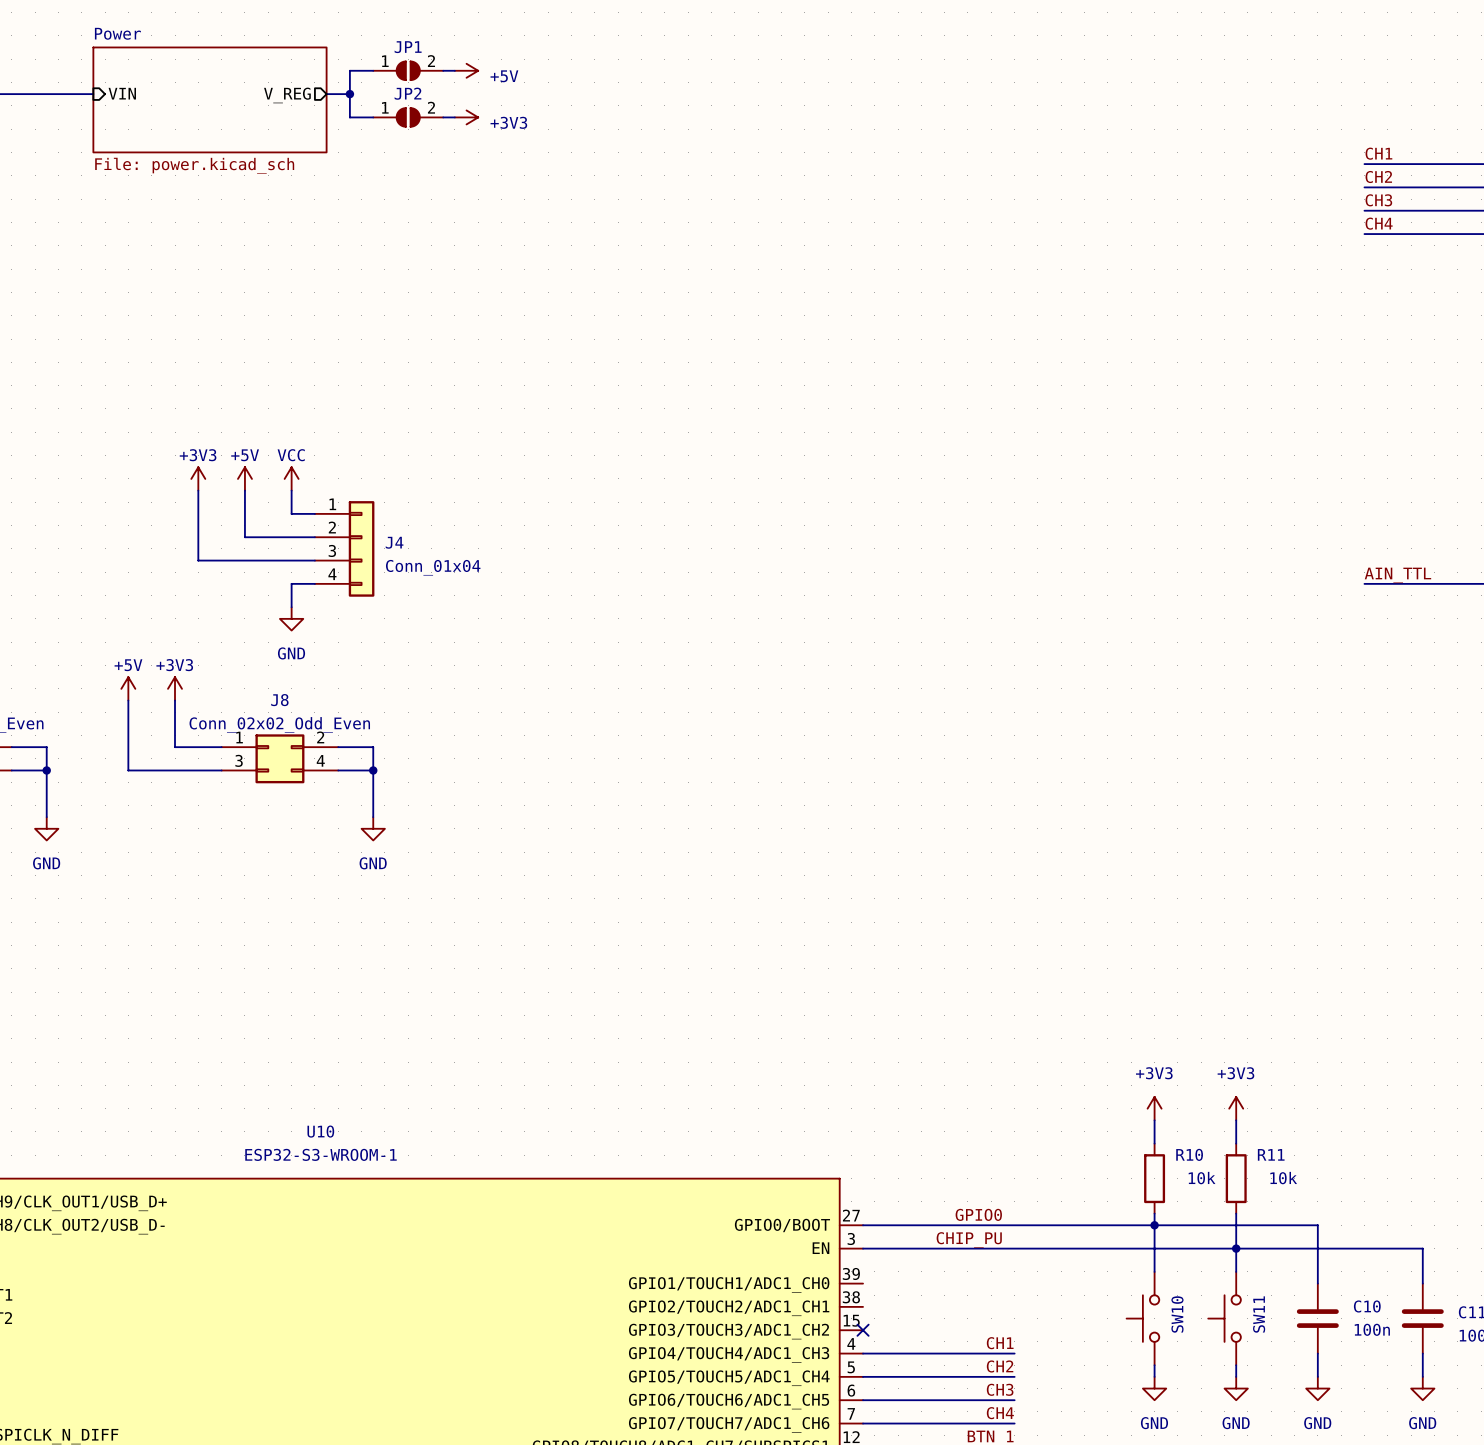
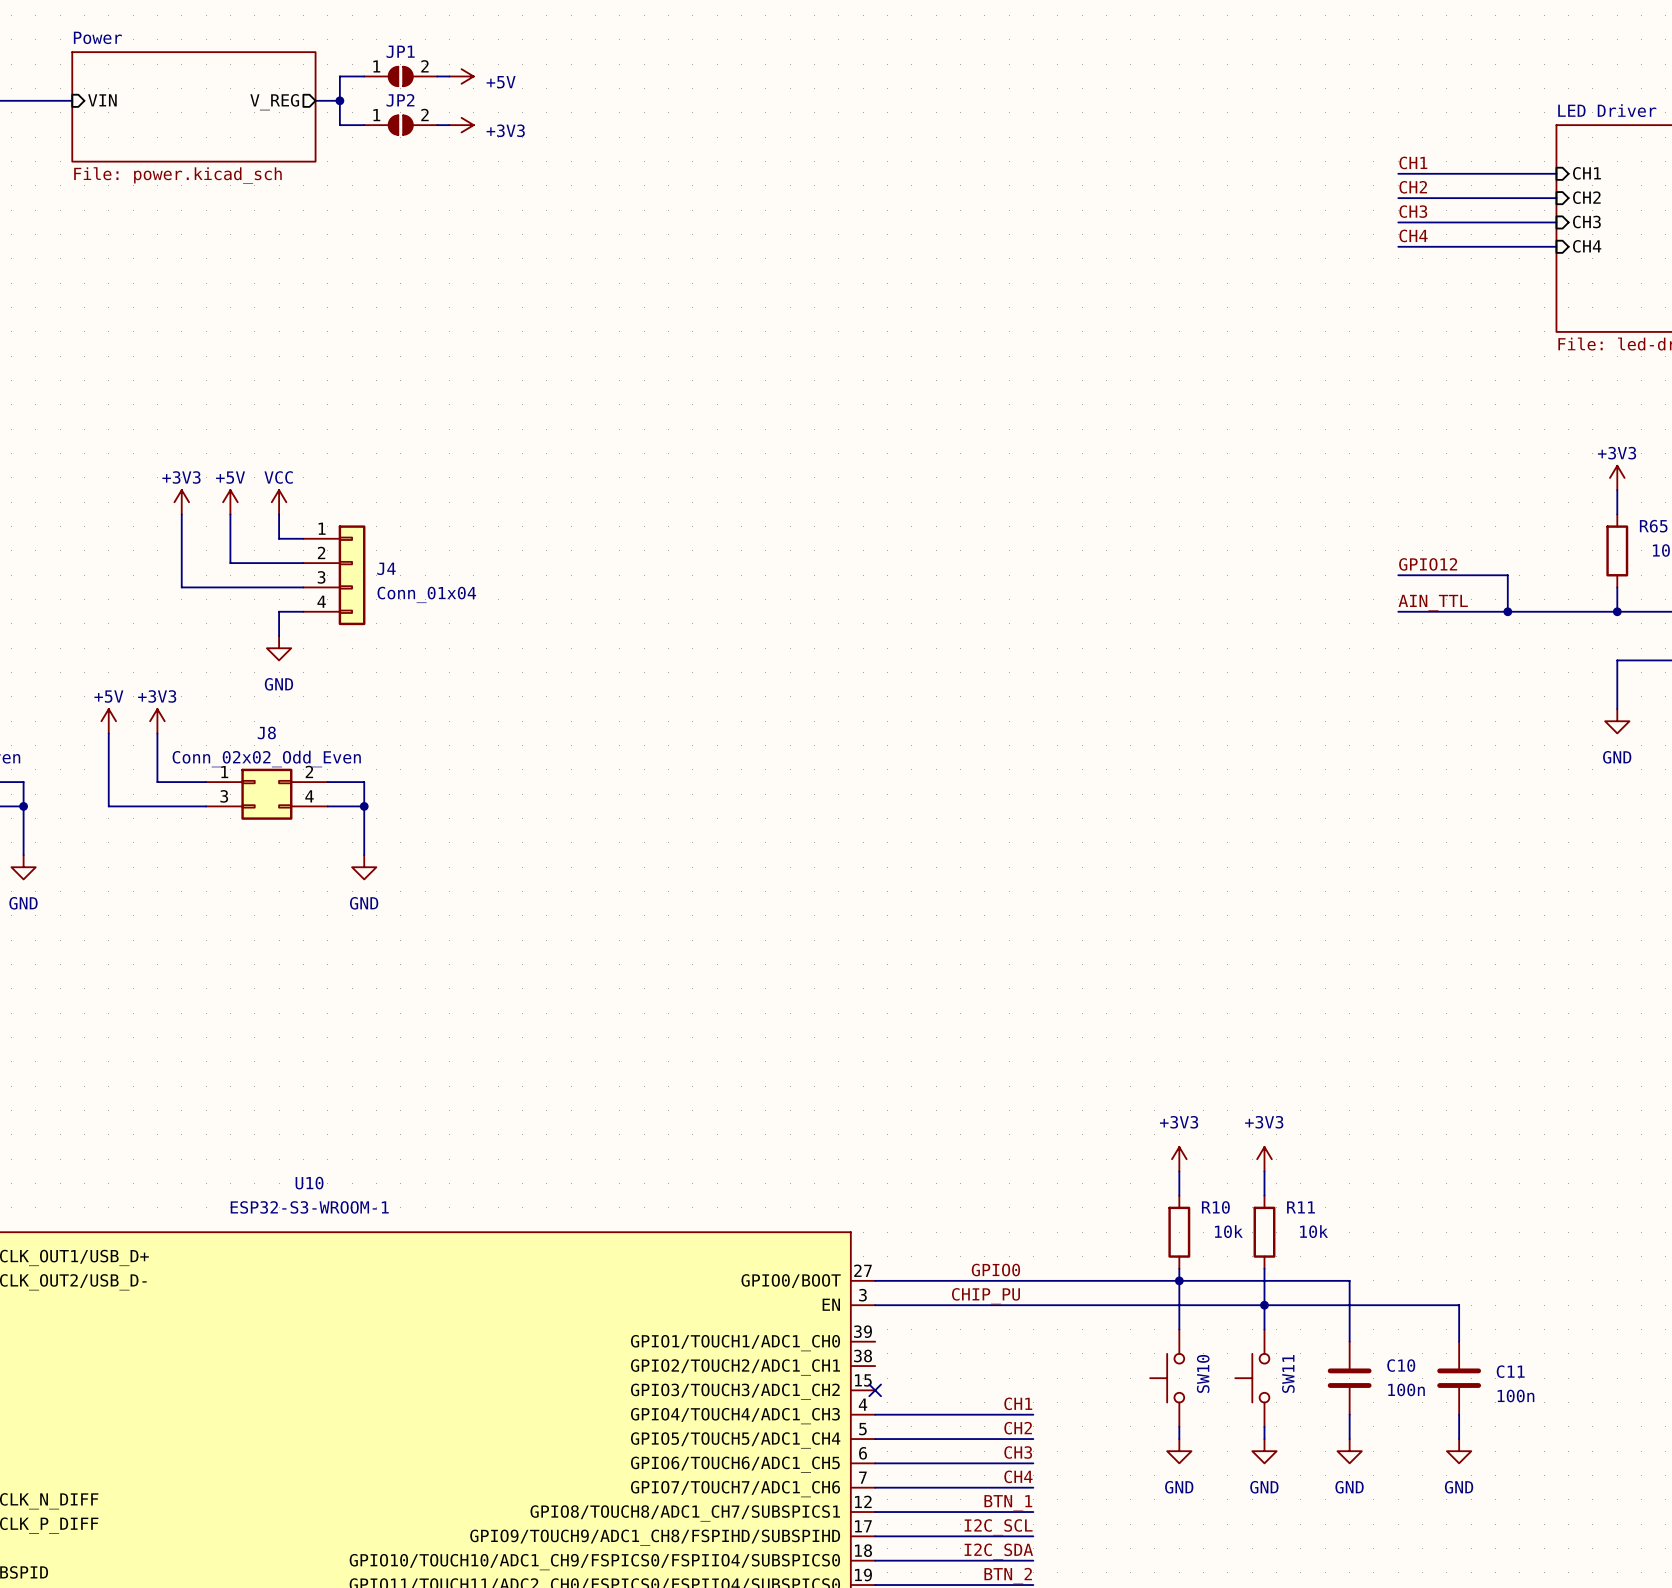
label: none -> GPIO12 (1428, 564)
wire: none -> (1398, 575) (1507, 575) (1507, 611)
junction: none -> (1507, 611)

